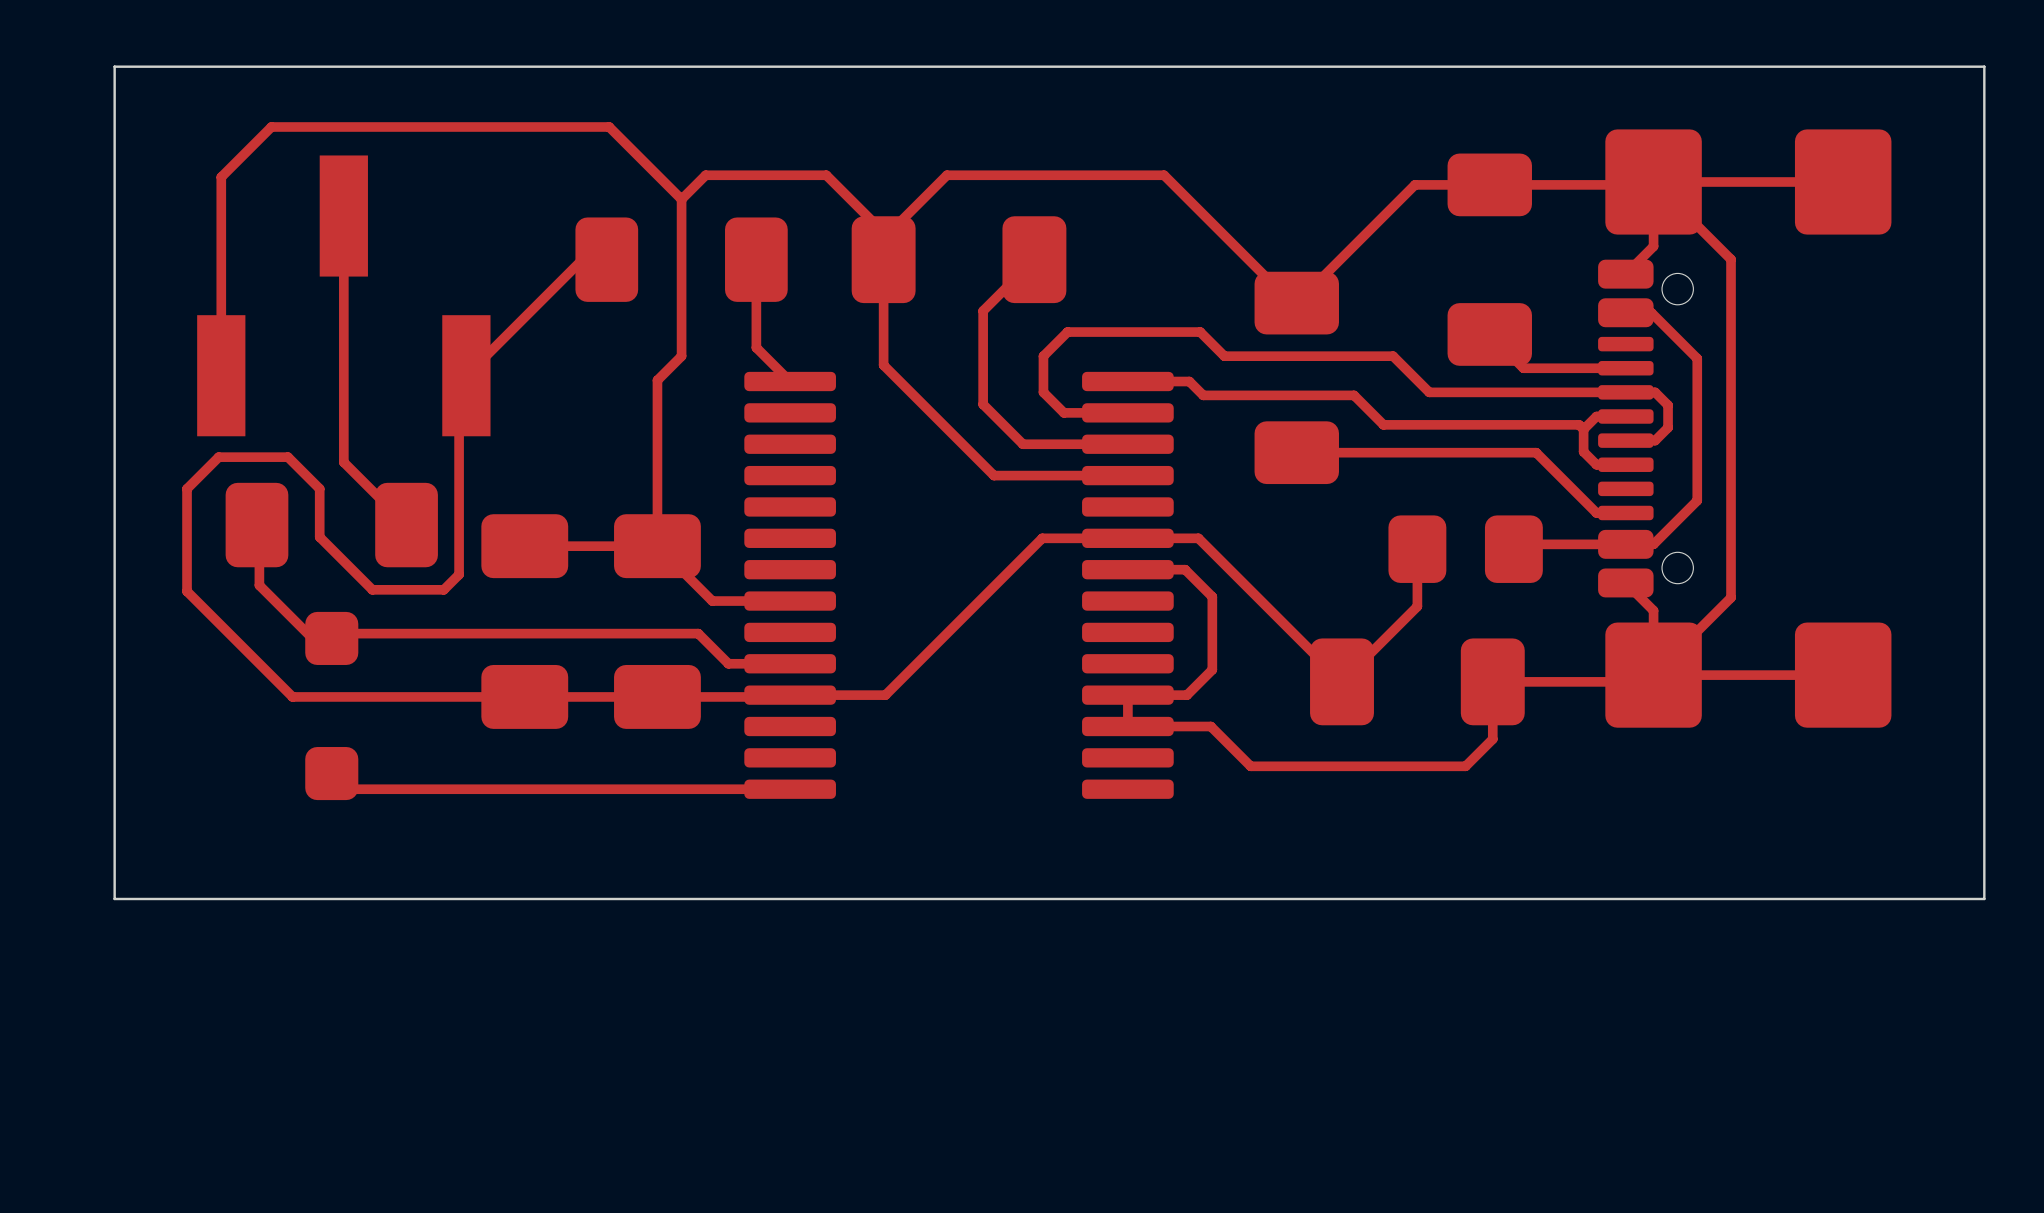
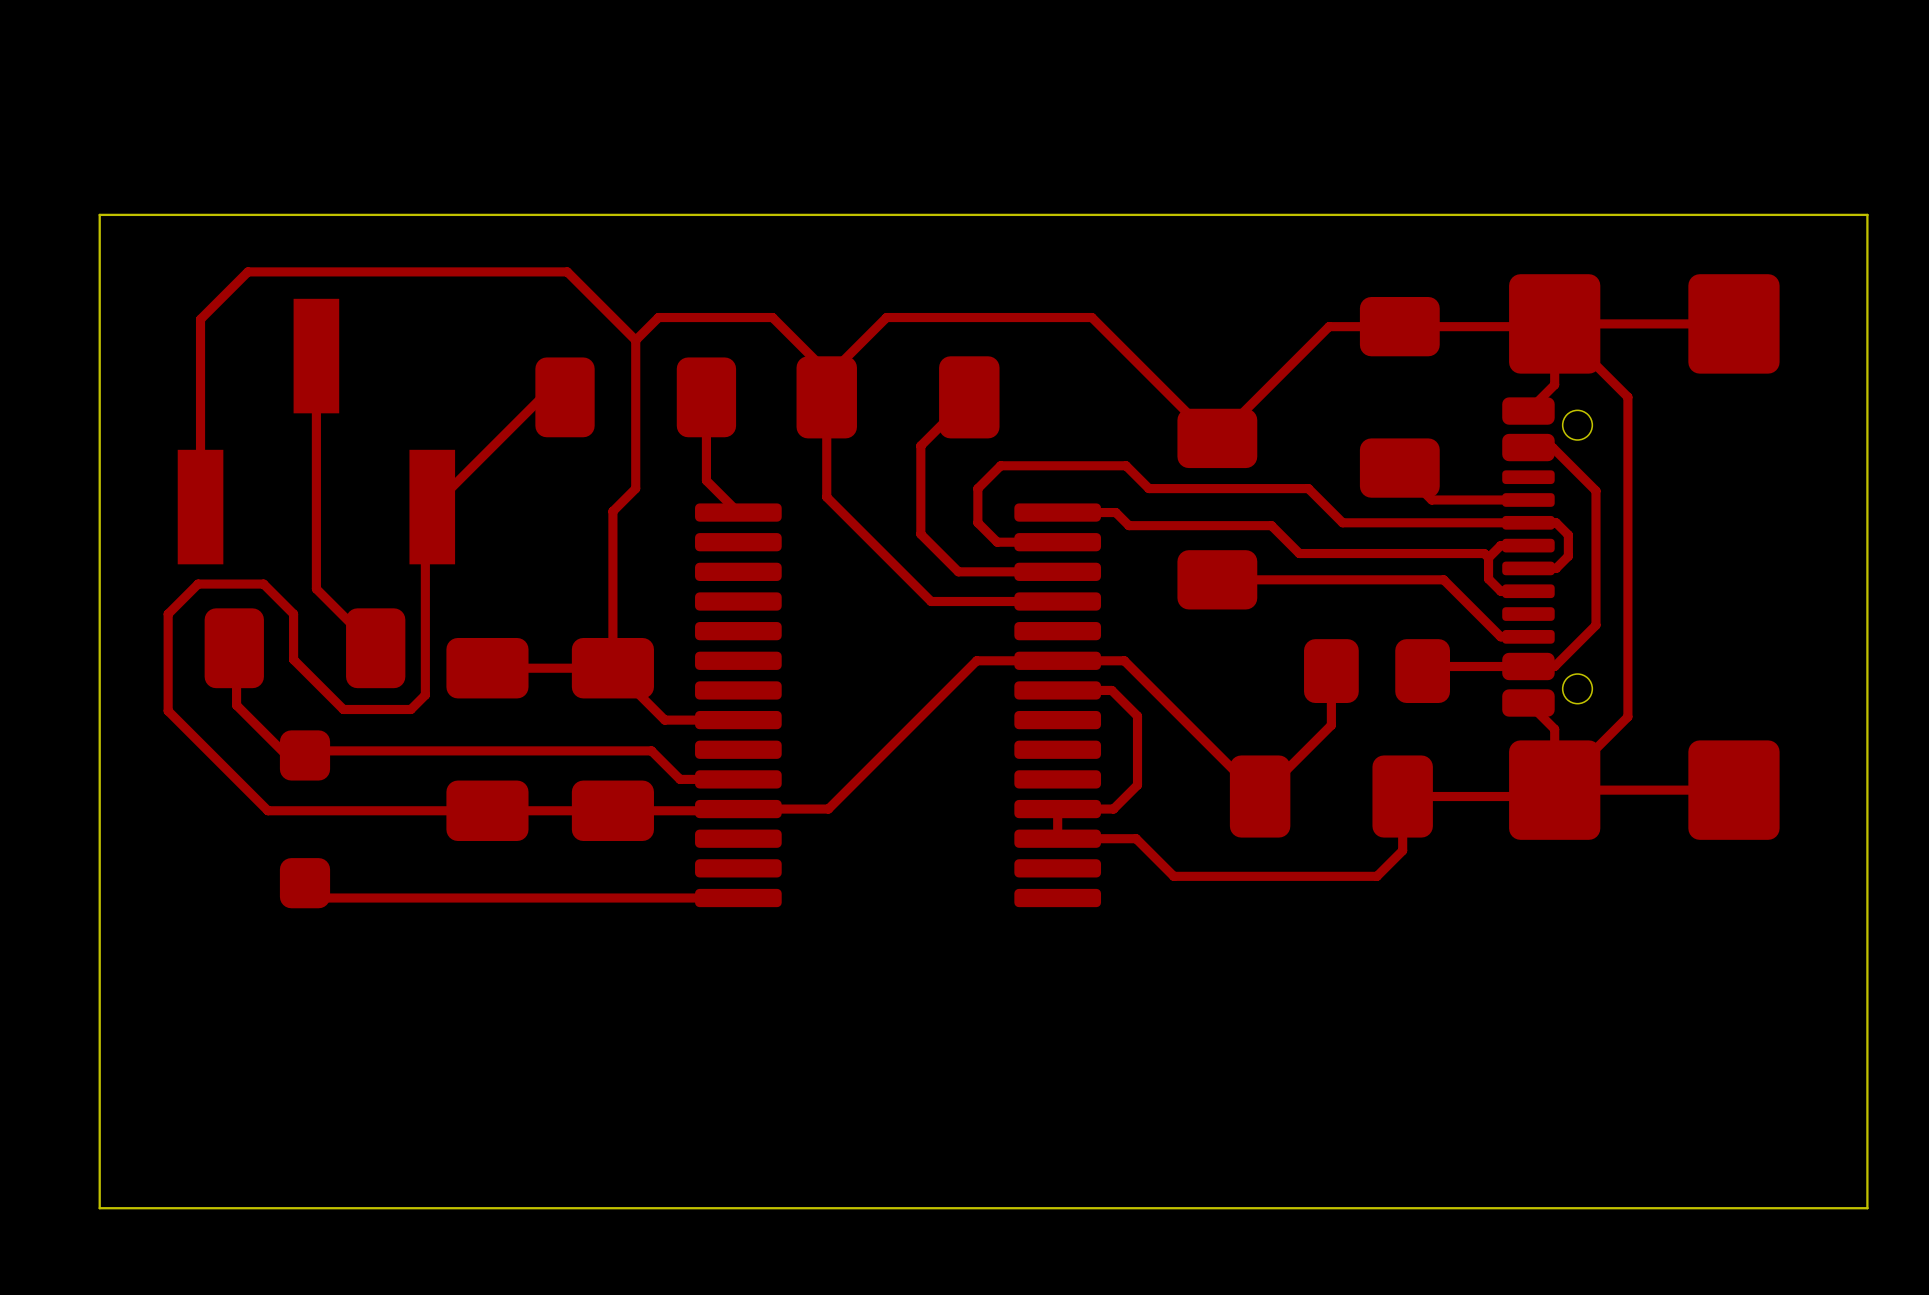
board edge: (1984, 898) (114, 898) -> (1867, 1001) (1867, 1208) (99, 1208) (99, 1001)

